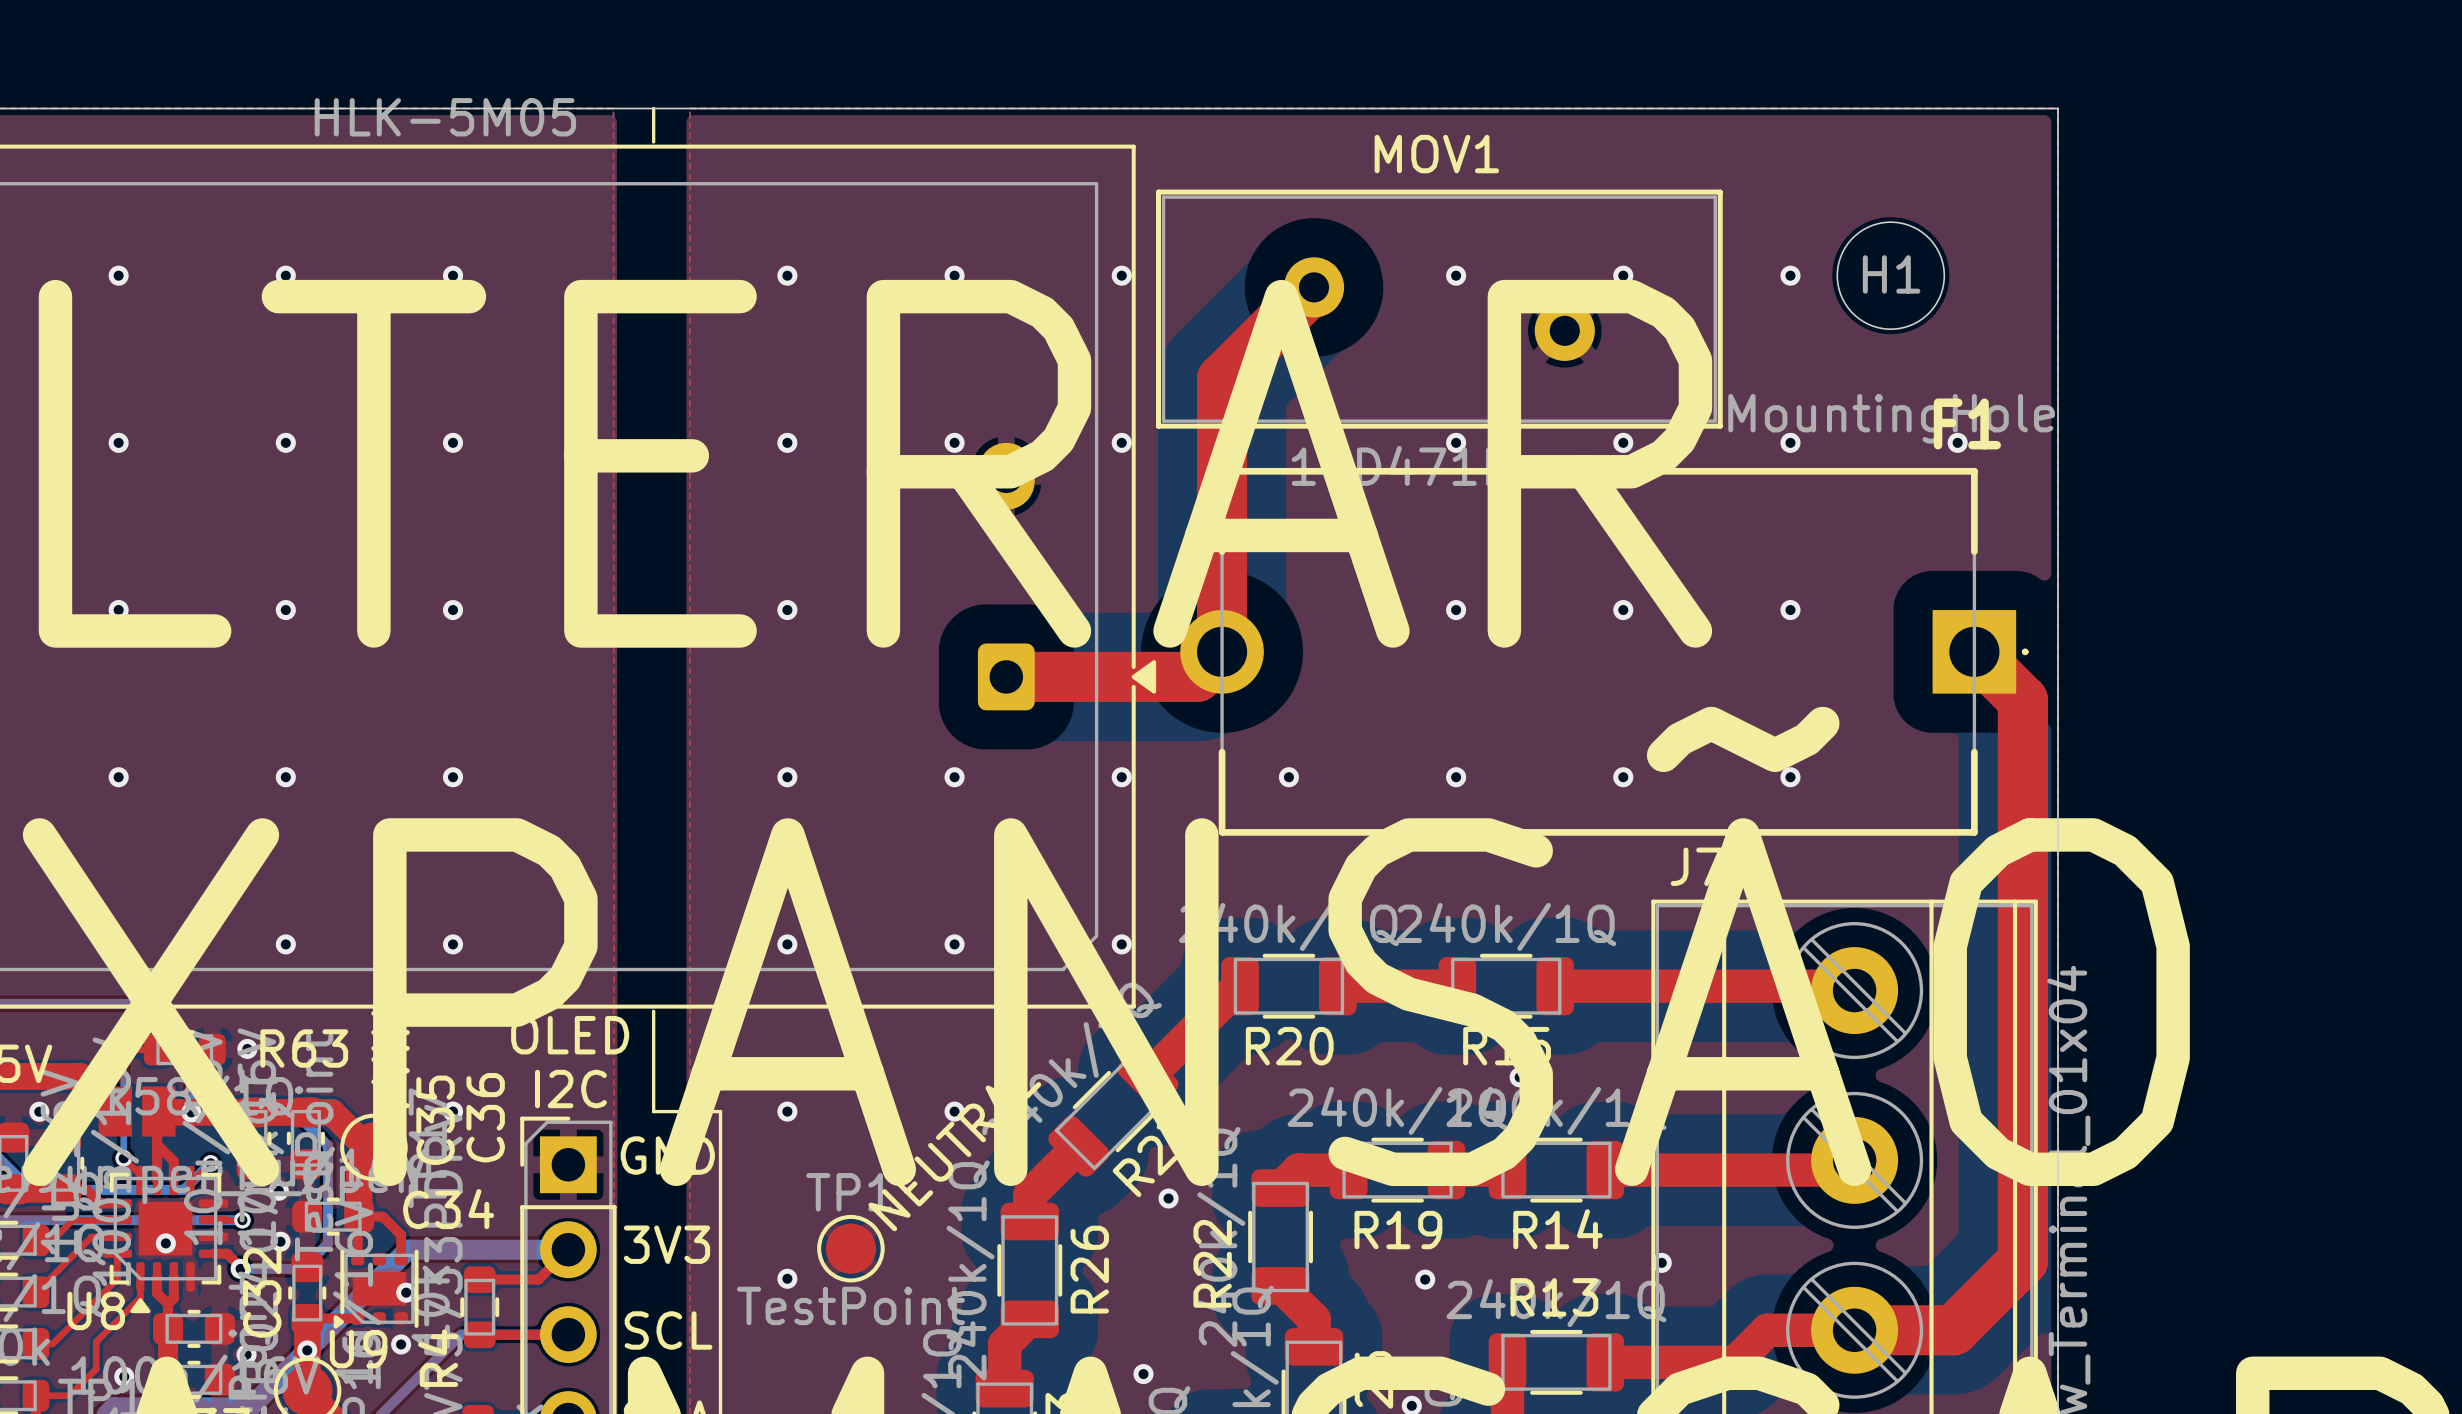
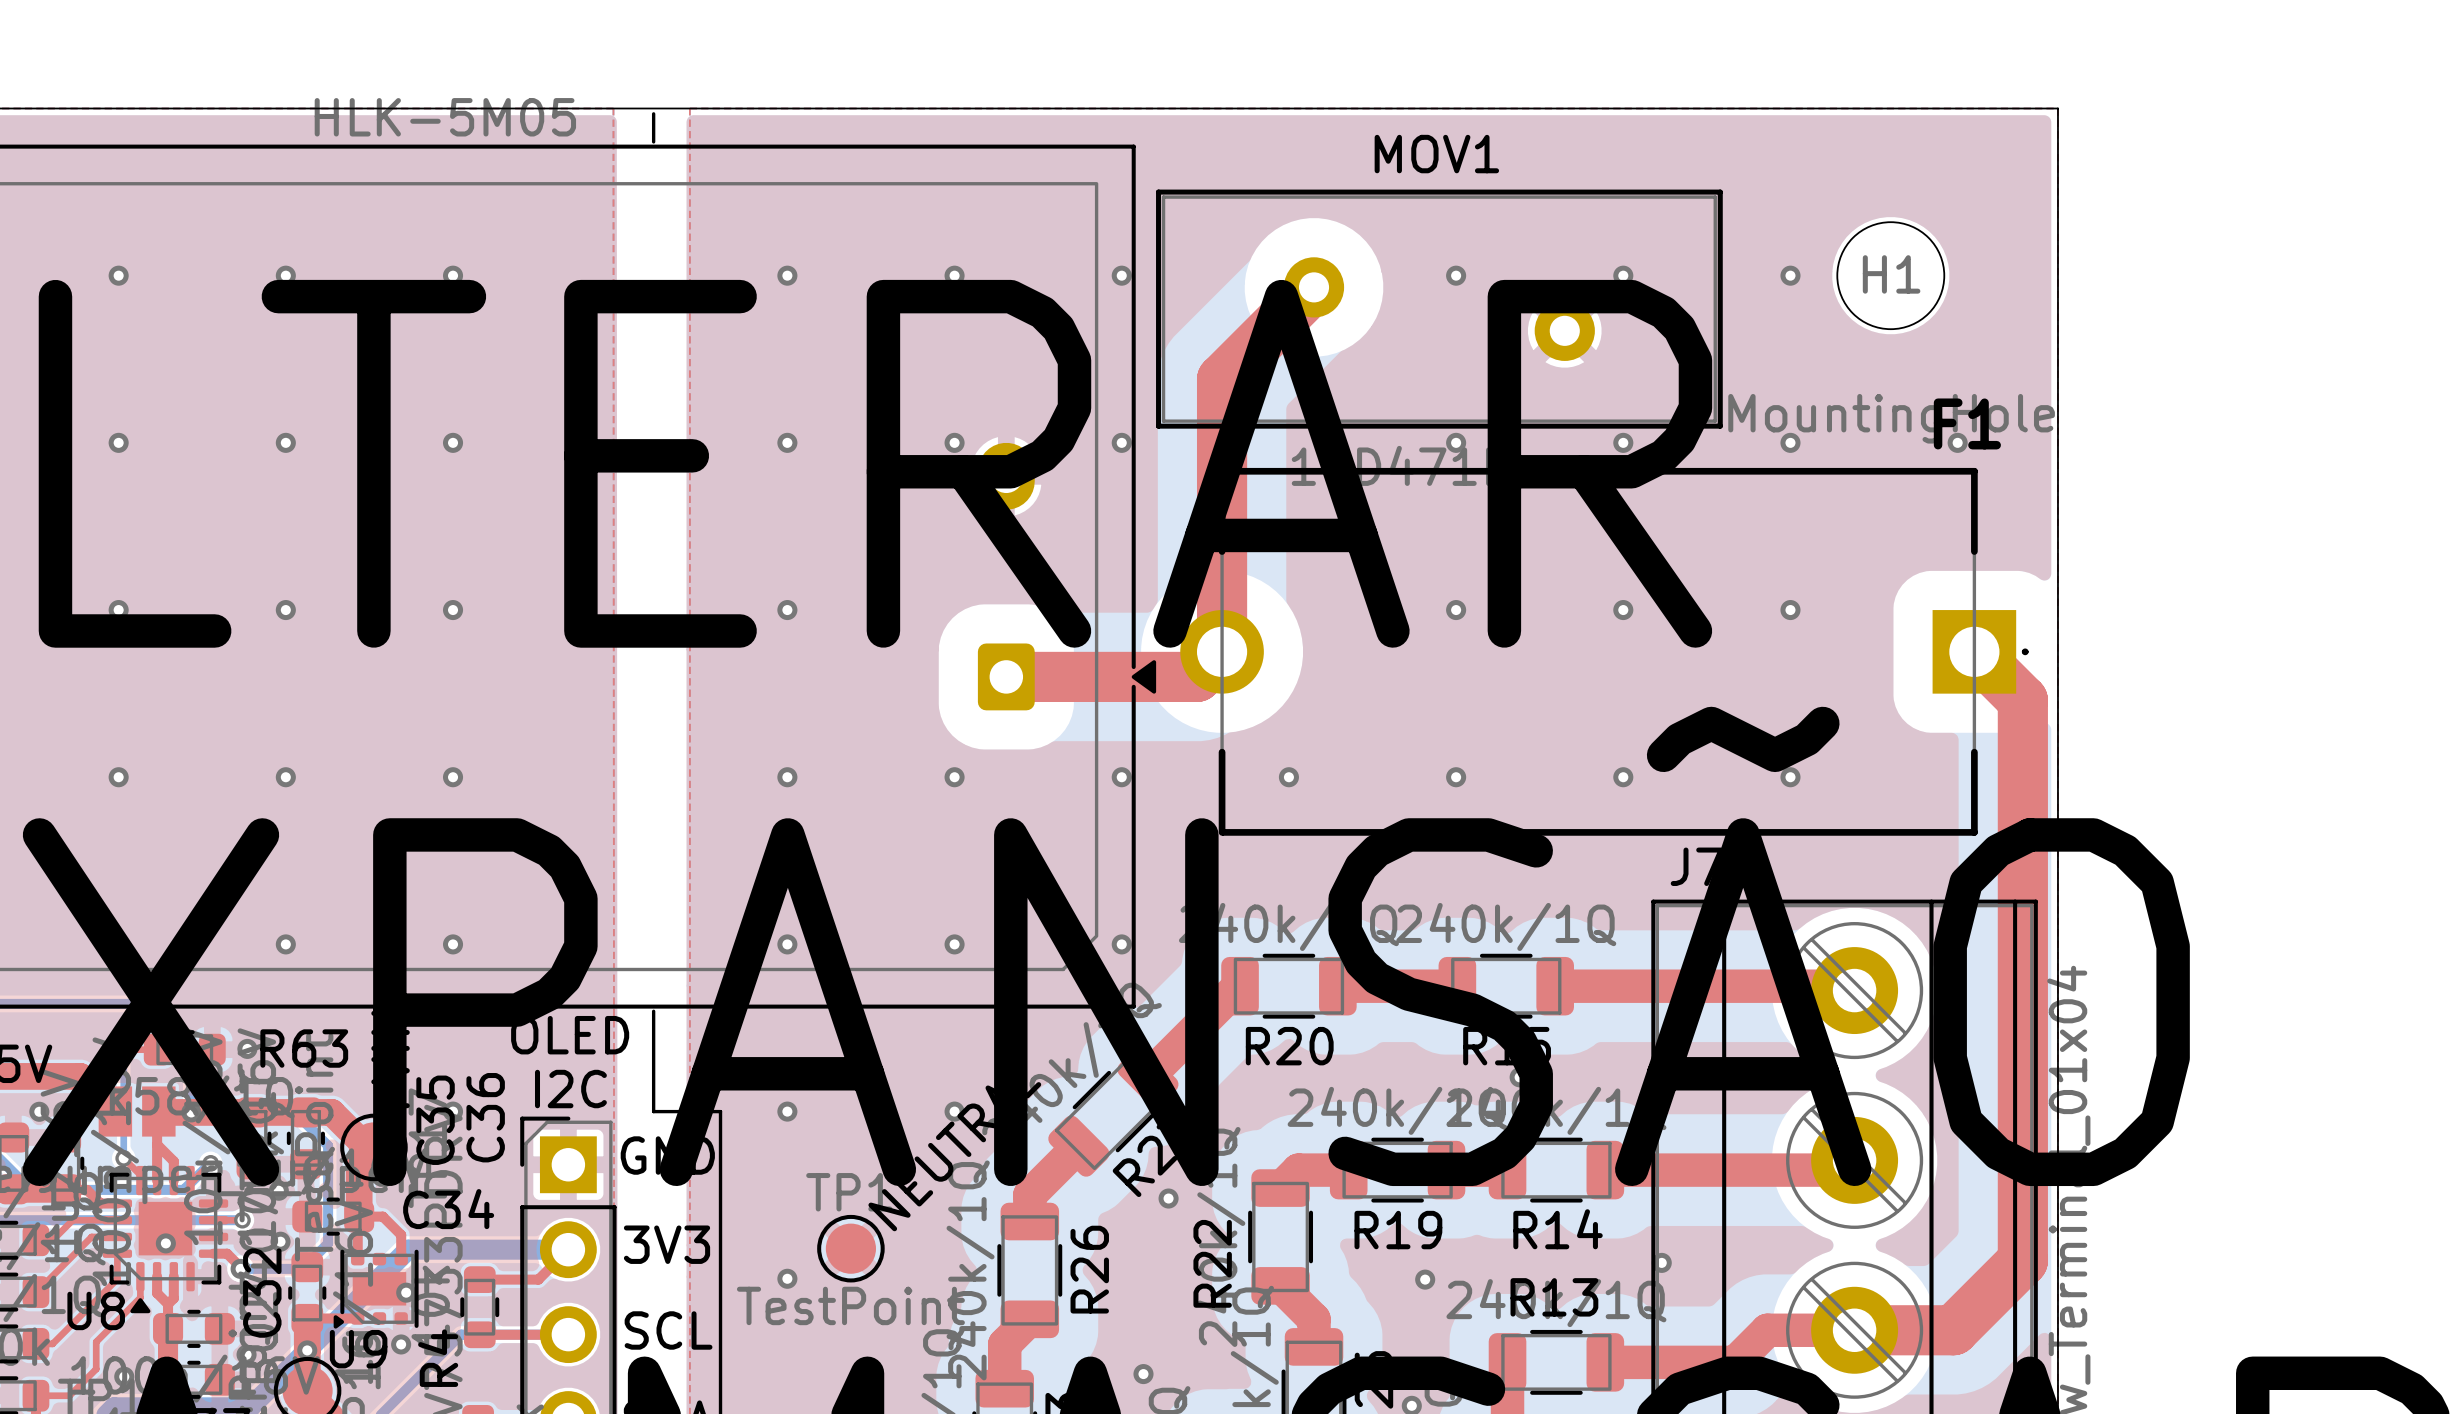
line: (653, 108) (653, 113) -> none

